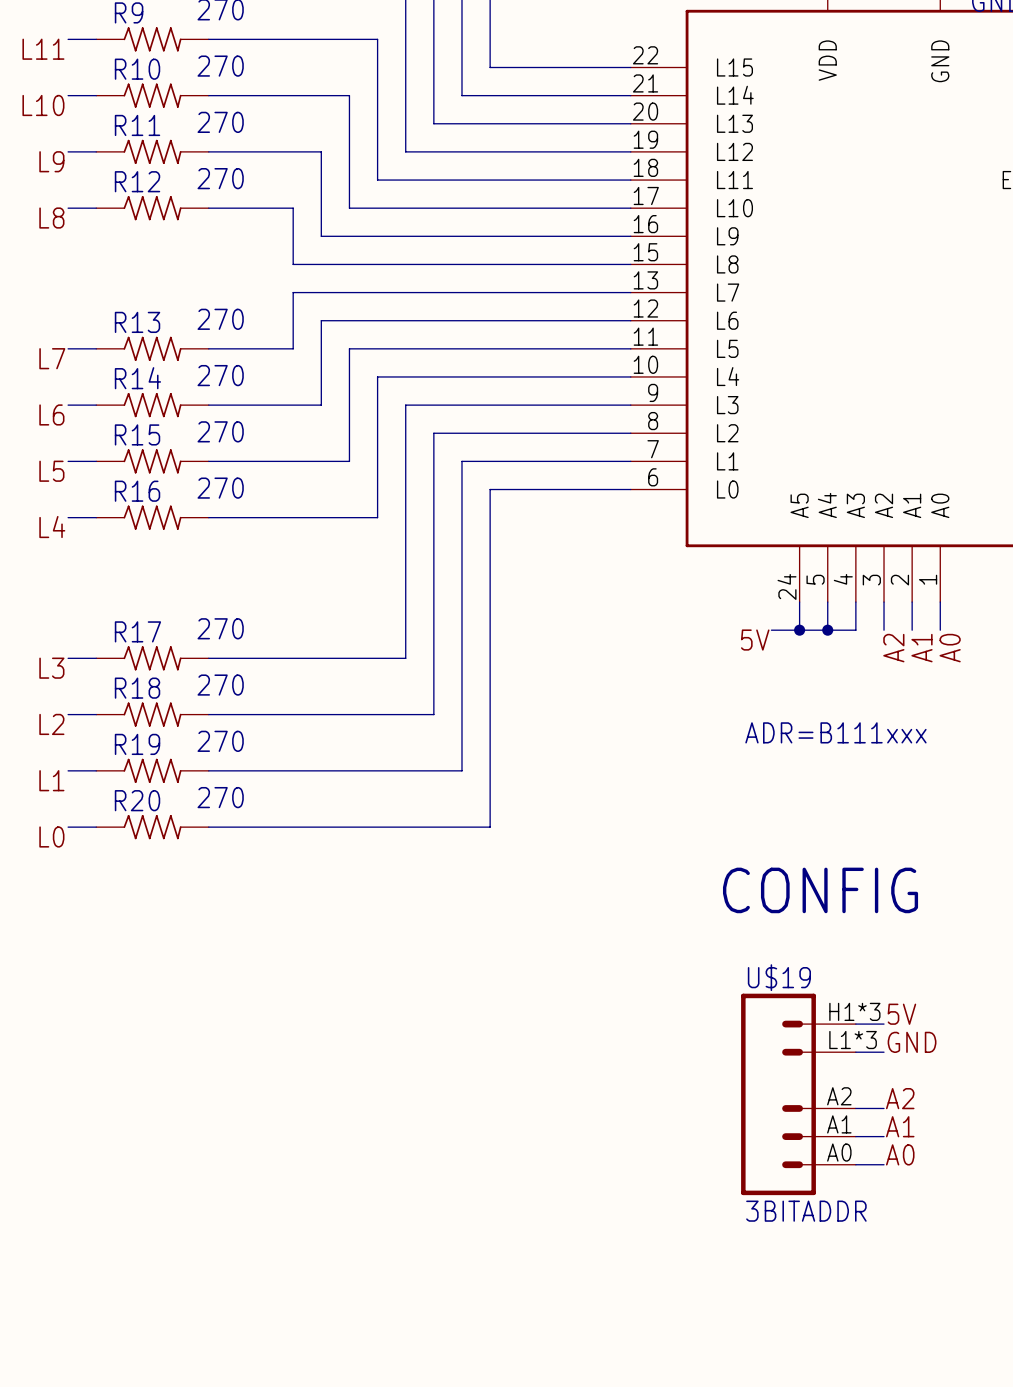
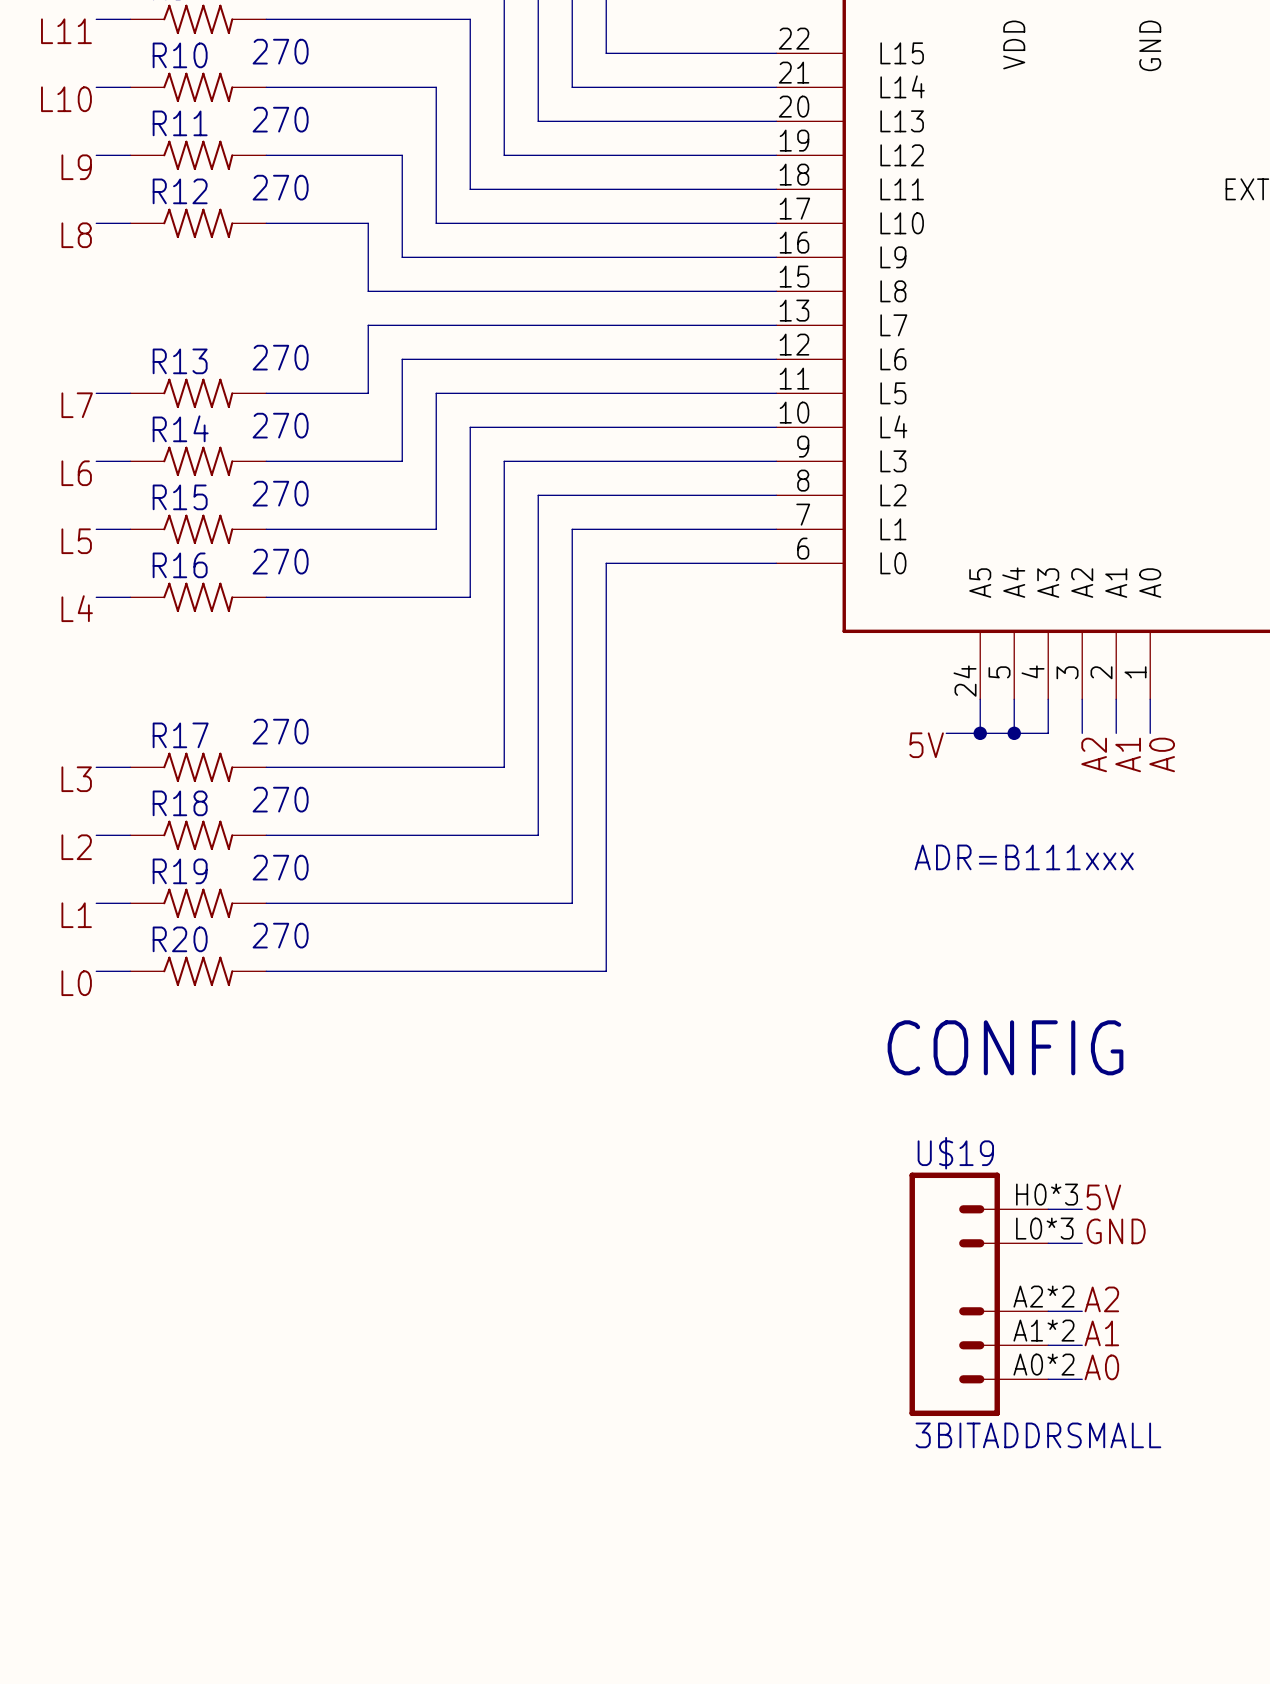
U$19 pin number: H1*3 (854, 1011) -> H0*3 (1047, 1194)
U$19 pin number: L1*3 (853, 1040) -> L0*3 (1044, 1228)
U$19 pin number: A2 (839, 1096) -> A2*2 (1043, 1296)
U$19 pin number: A1 (839, 1124) -> A1*2 (1043, 1330)
U$19 pin number: A0 (839, 1152) -> A0*2 (1043, 1364)
U$19 value: 3BITADDR (806, 1211) -> 3BITADDRSMALL (1038, 1435)

